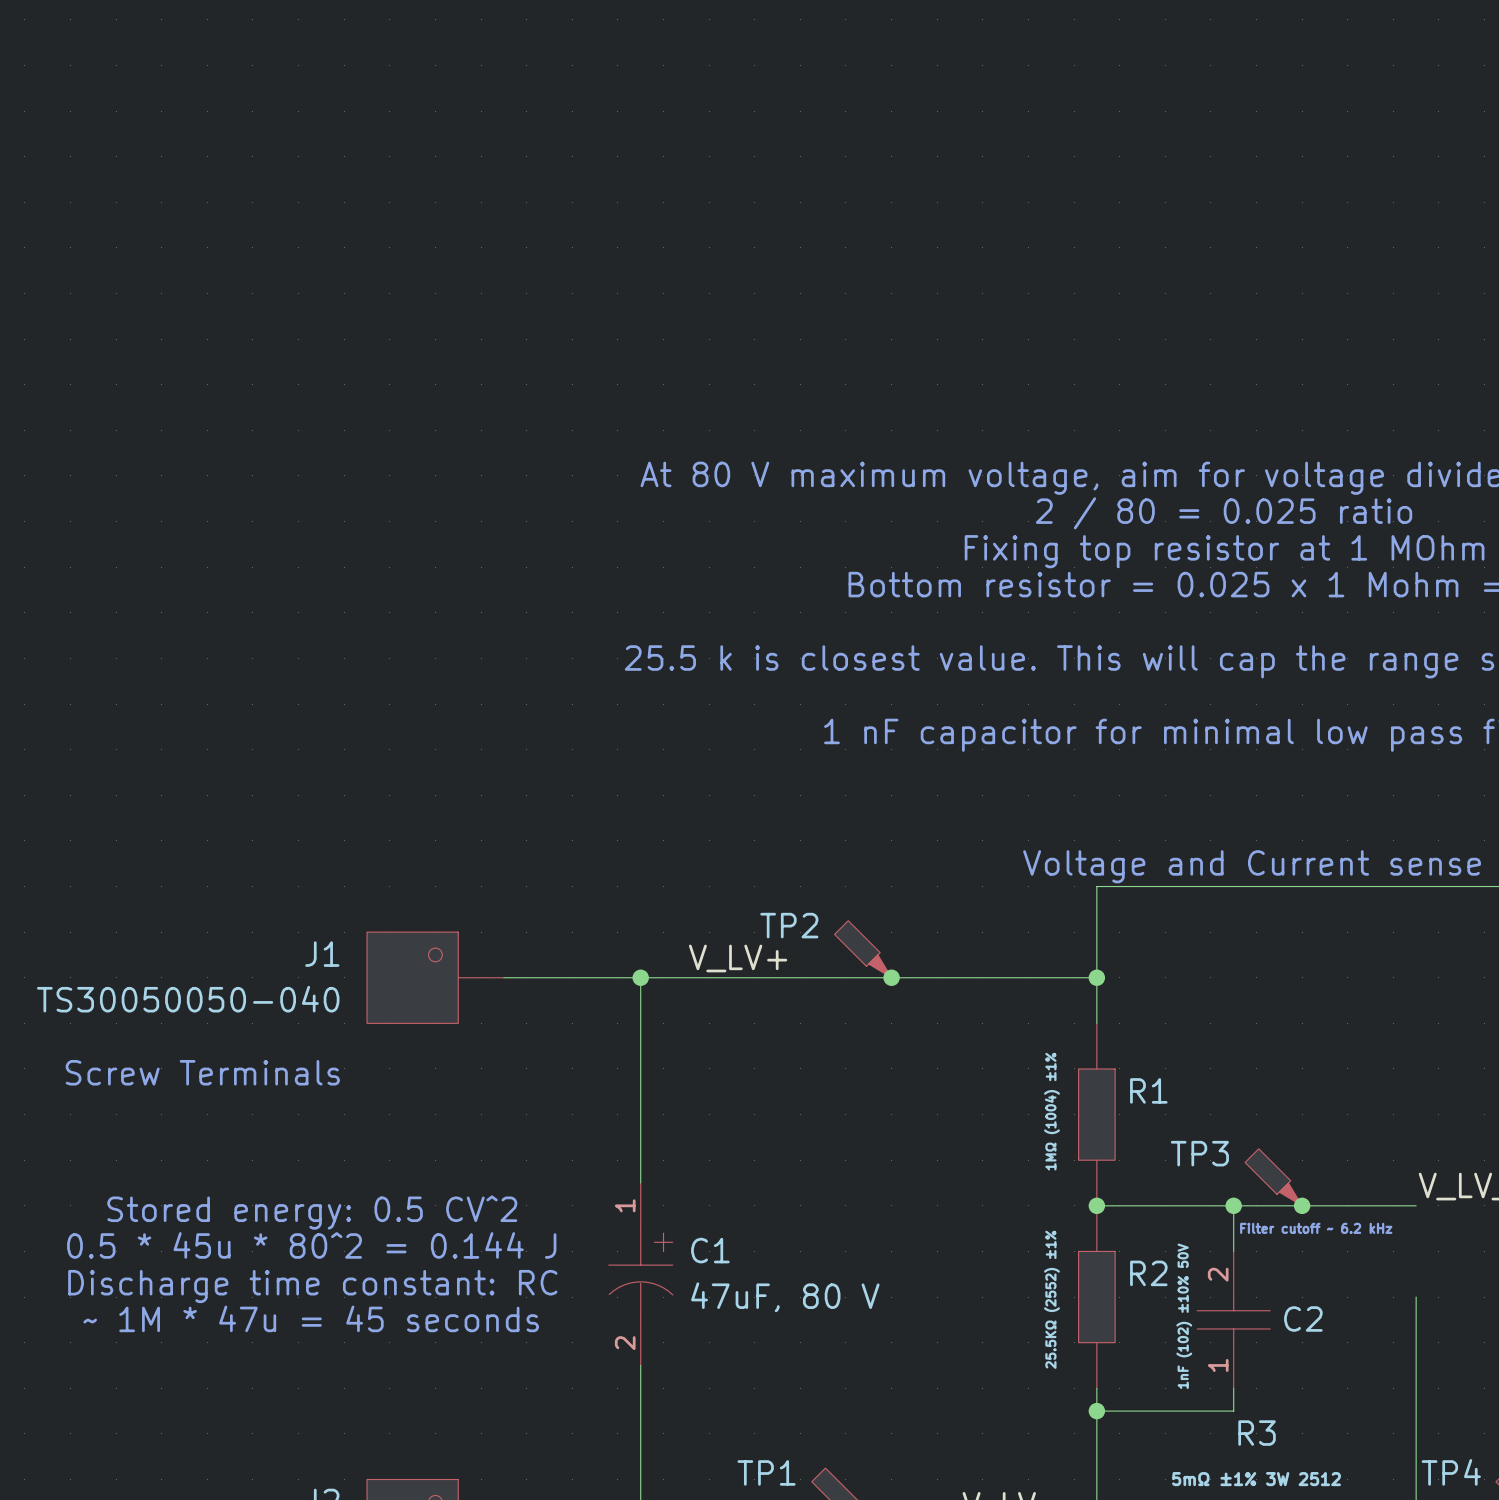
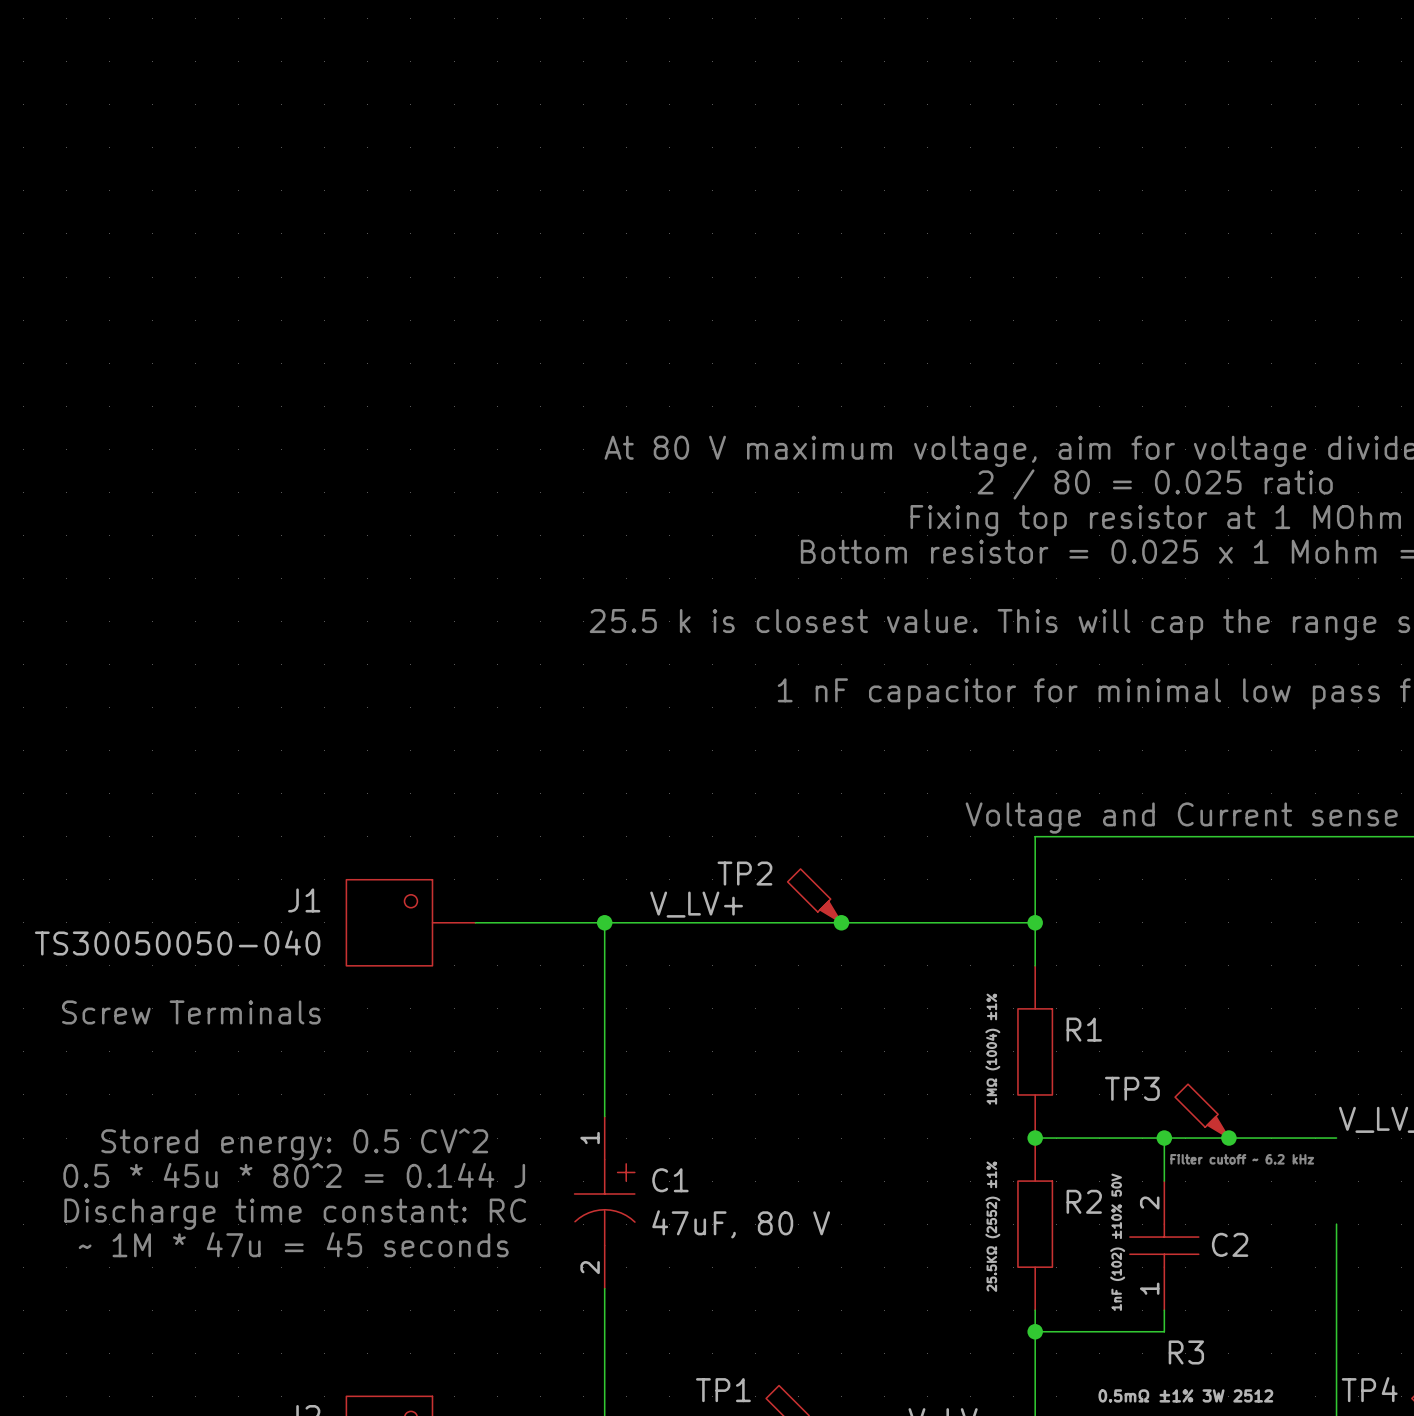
R3 value: 5mΩ ±1% 3W 2512 (1256, 1479) -> 0.5mΩ ±1% 3W 2512 (1185, 1395)

